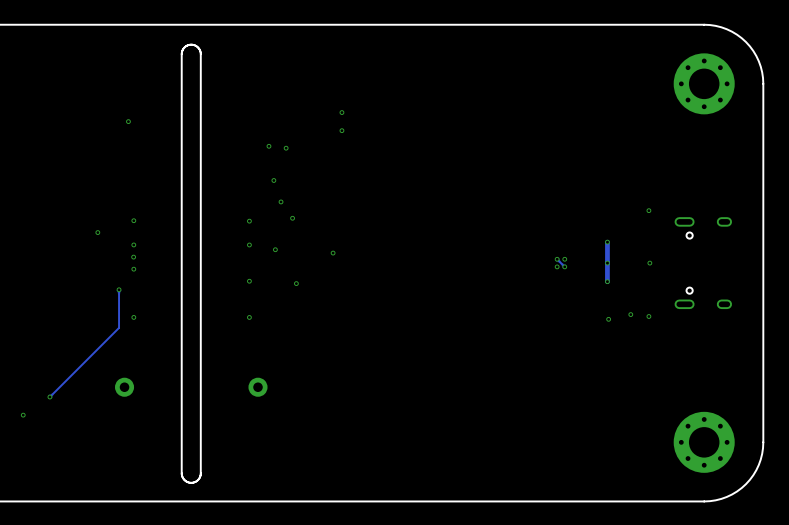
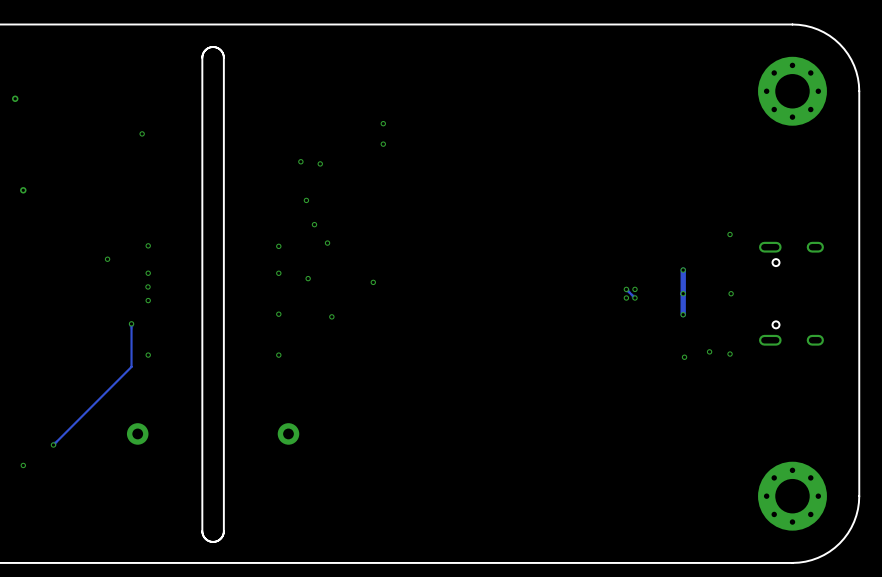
via: none -> (15, 98)
via: none -> (23, 190)

